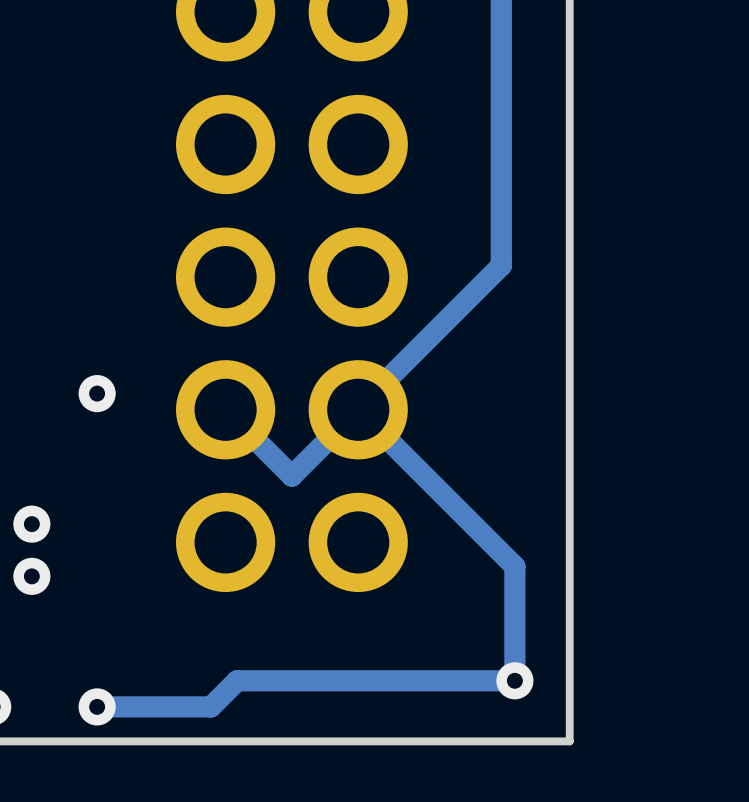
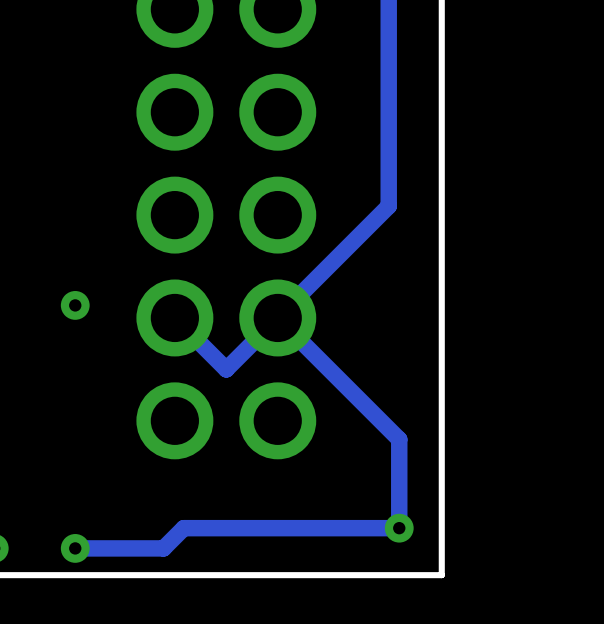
via: (31, 524) -> none
via: (31, 576) -> none

